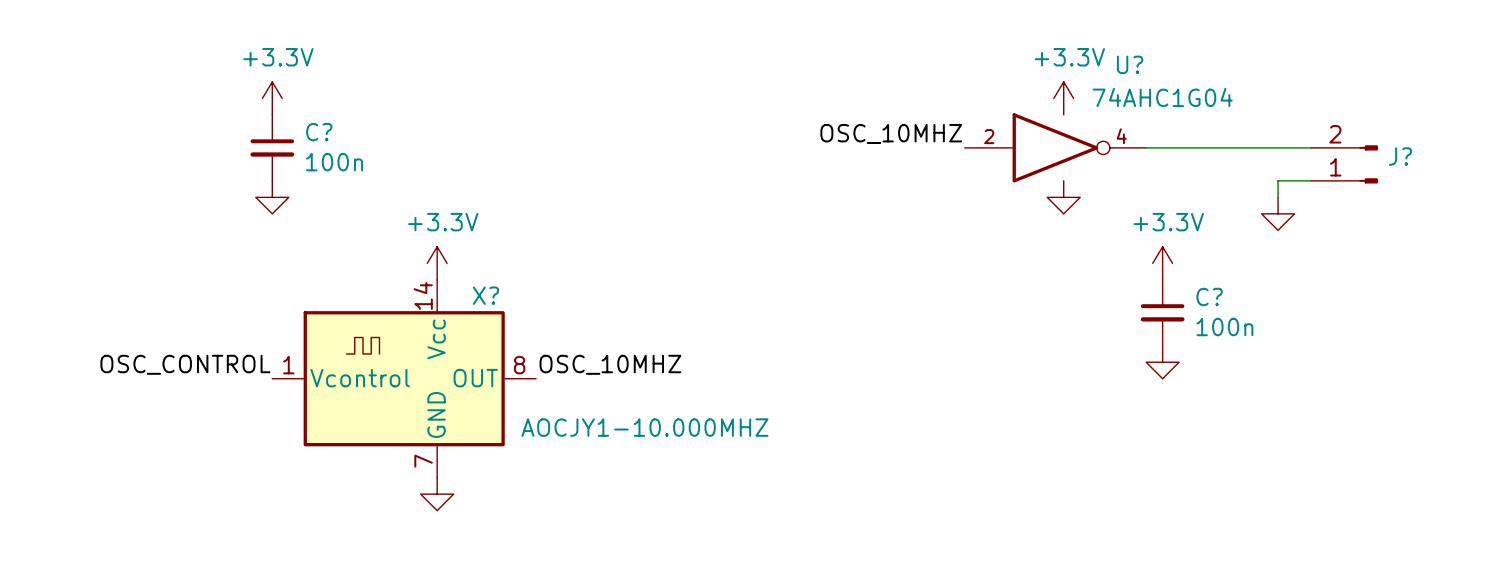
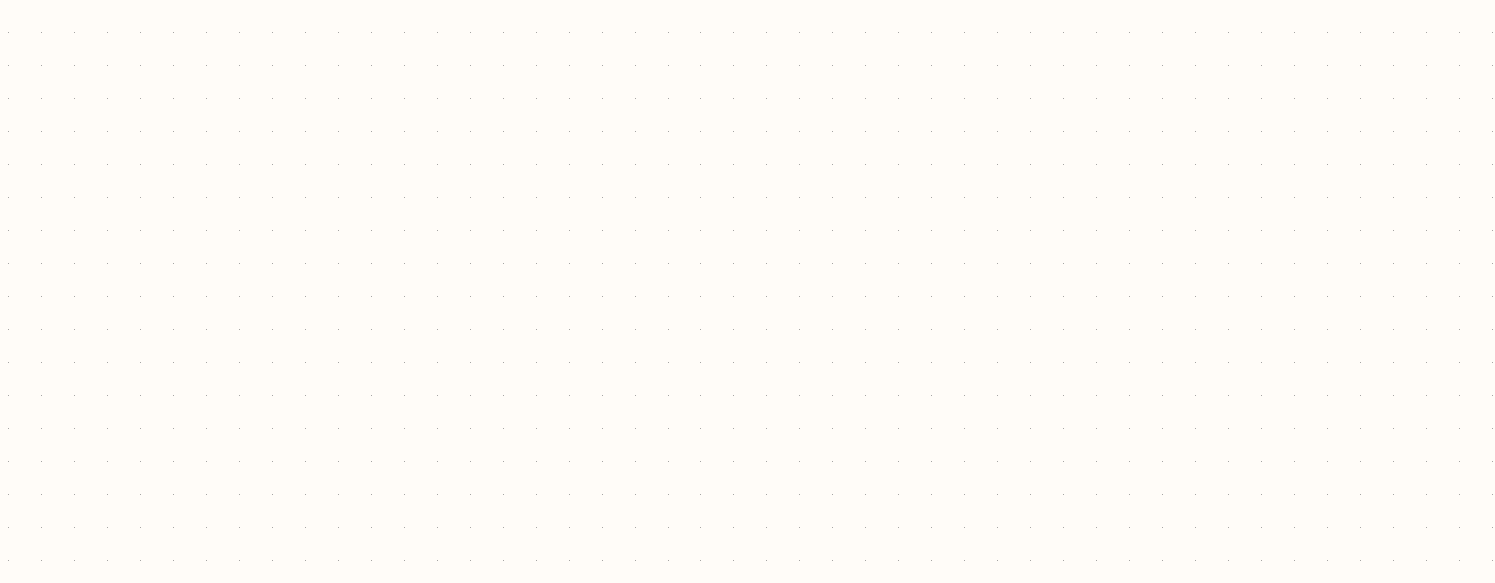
power symbol: +3.3V (272, 98) -> none
power symbol: +3.3V (1063, 98) -> none
label: OSC_10MHZ (891, 133) -> none
C?: 100n (272, 147) -> none
U?: 74AHC1G04 (1055, 147) -> none
wire: (1146, 147) (1311, 147) -> none
J?: (1344, 164) -> none
wire: (1311, 180) (1278, 180) (1278, 197) -> none
power symbol: (272, 197) -> none
power symbol: (1063, 197) -> none
power symbol: (1278, 213) -> none
power symbol: +3.3V (437, 263) -> none
power symbol: +3.3V (1162, 263) -> none
C?: 100n (1162, 312) -> none
power symbol: (1162, 362) -> none
label: OSC_CONTROL (185, 364) -> none
label: OSC_10MHZ (610, 364) -> none
X?: AOCJY1-10.000MHZ (404, 378) -> none
power symbol: (437, 494) -> none

